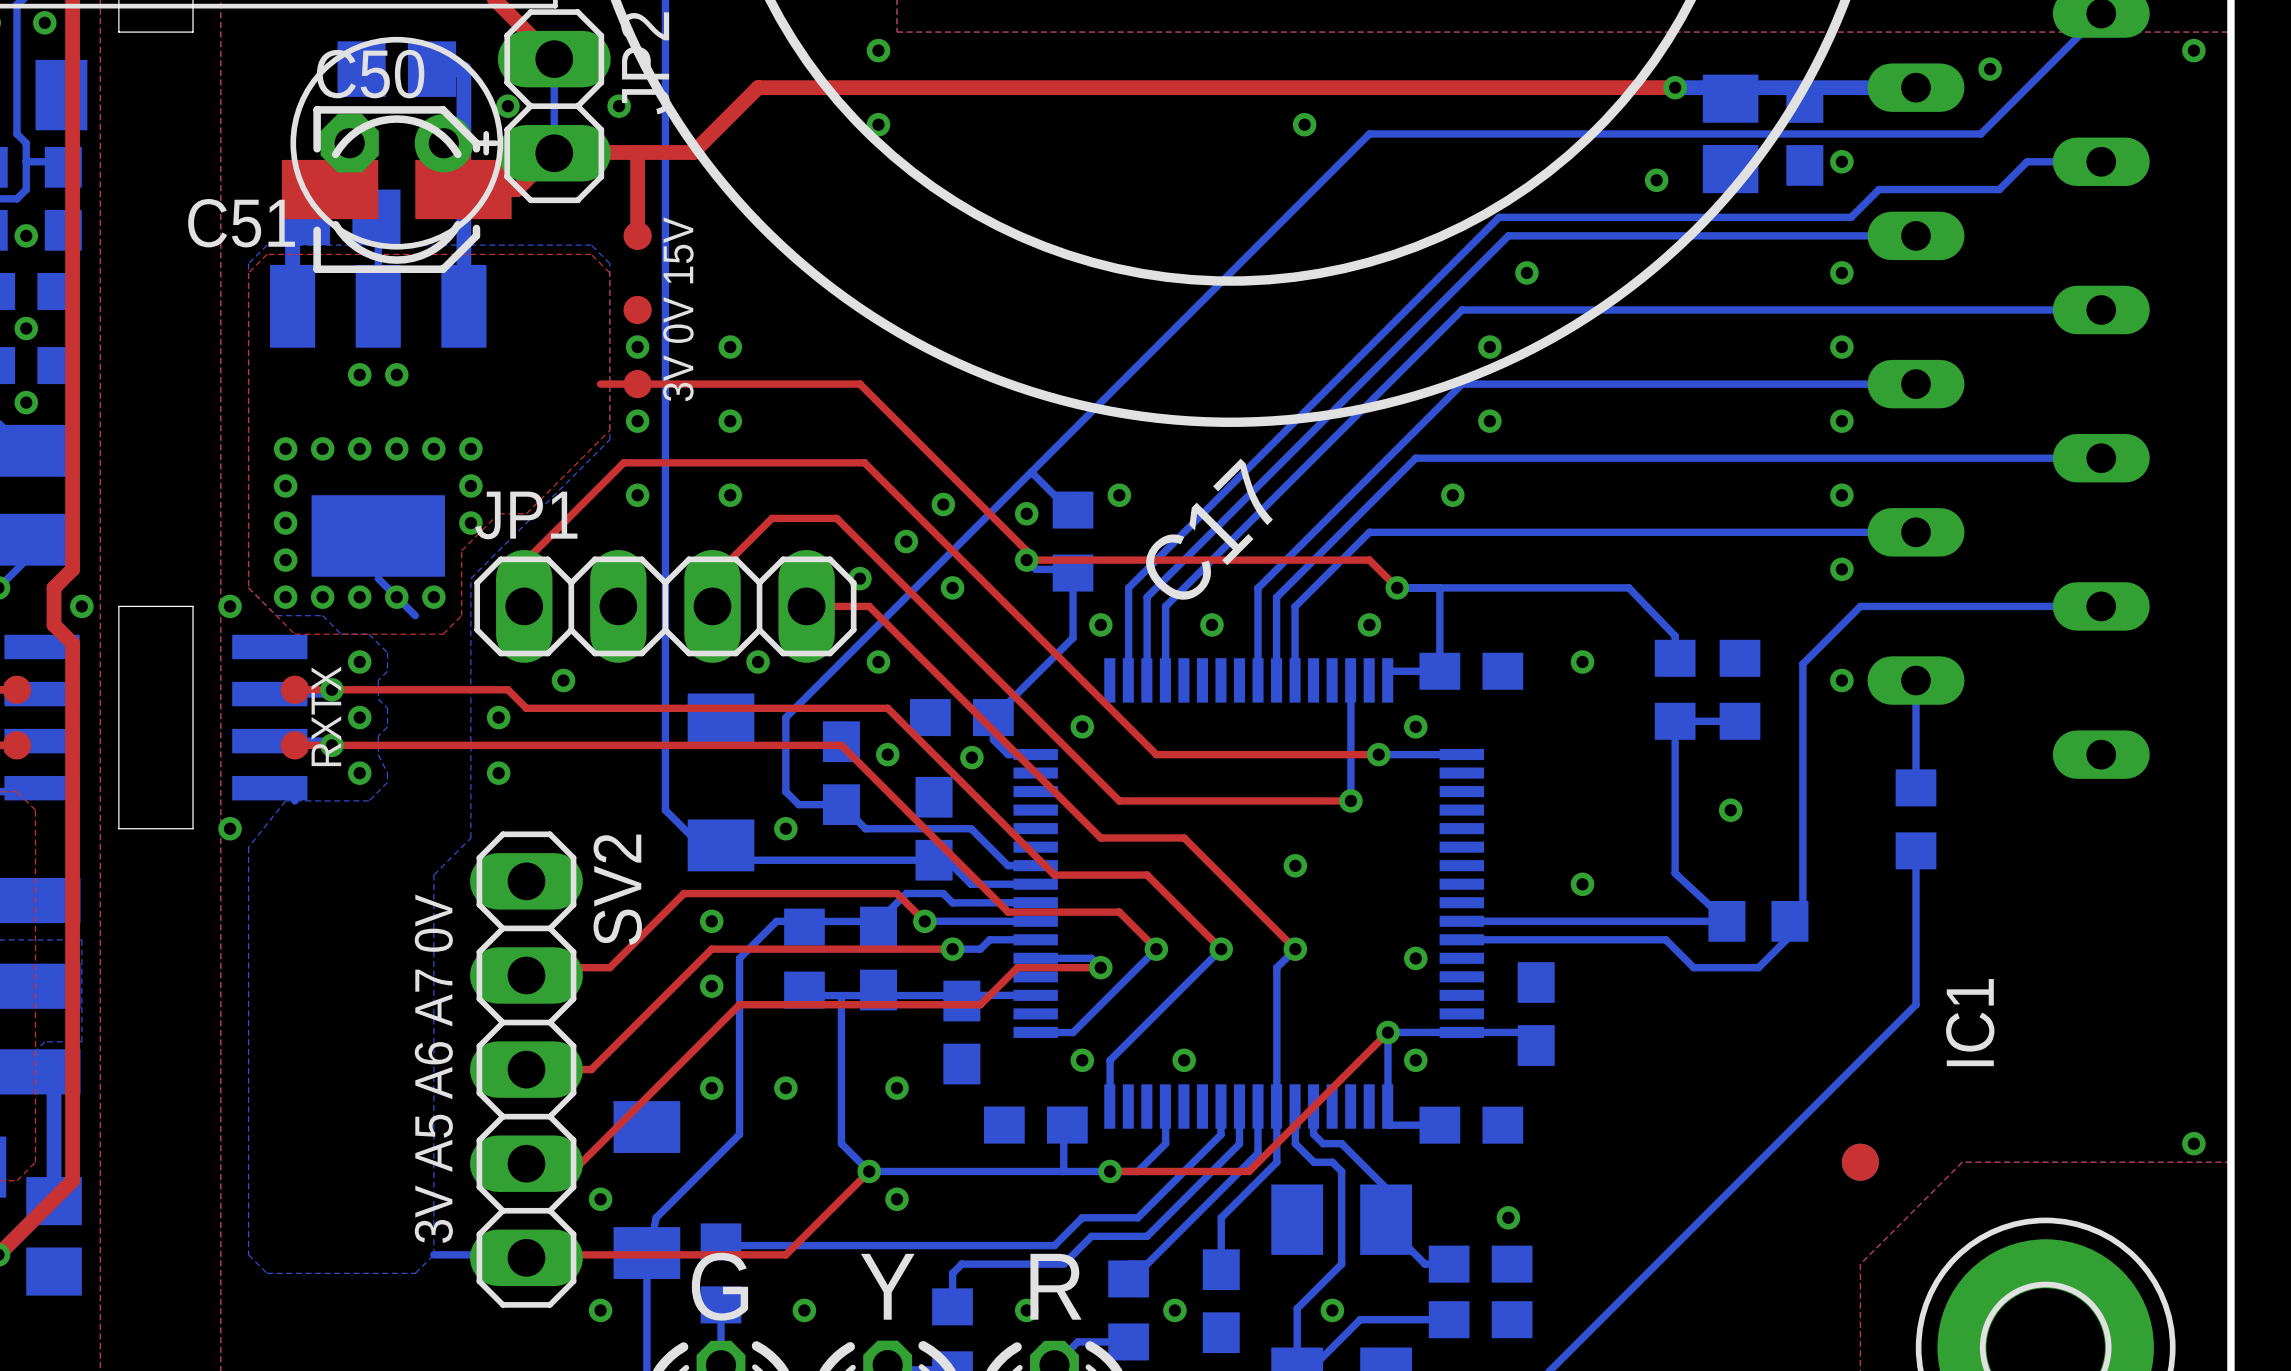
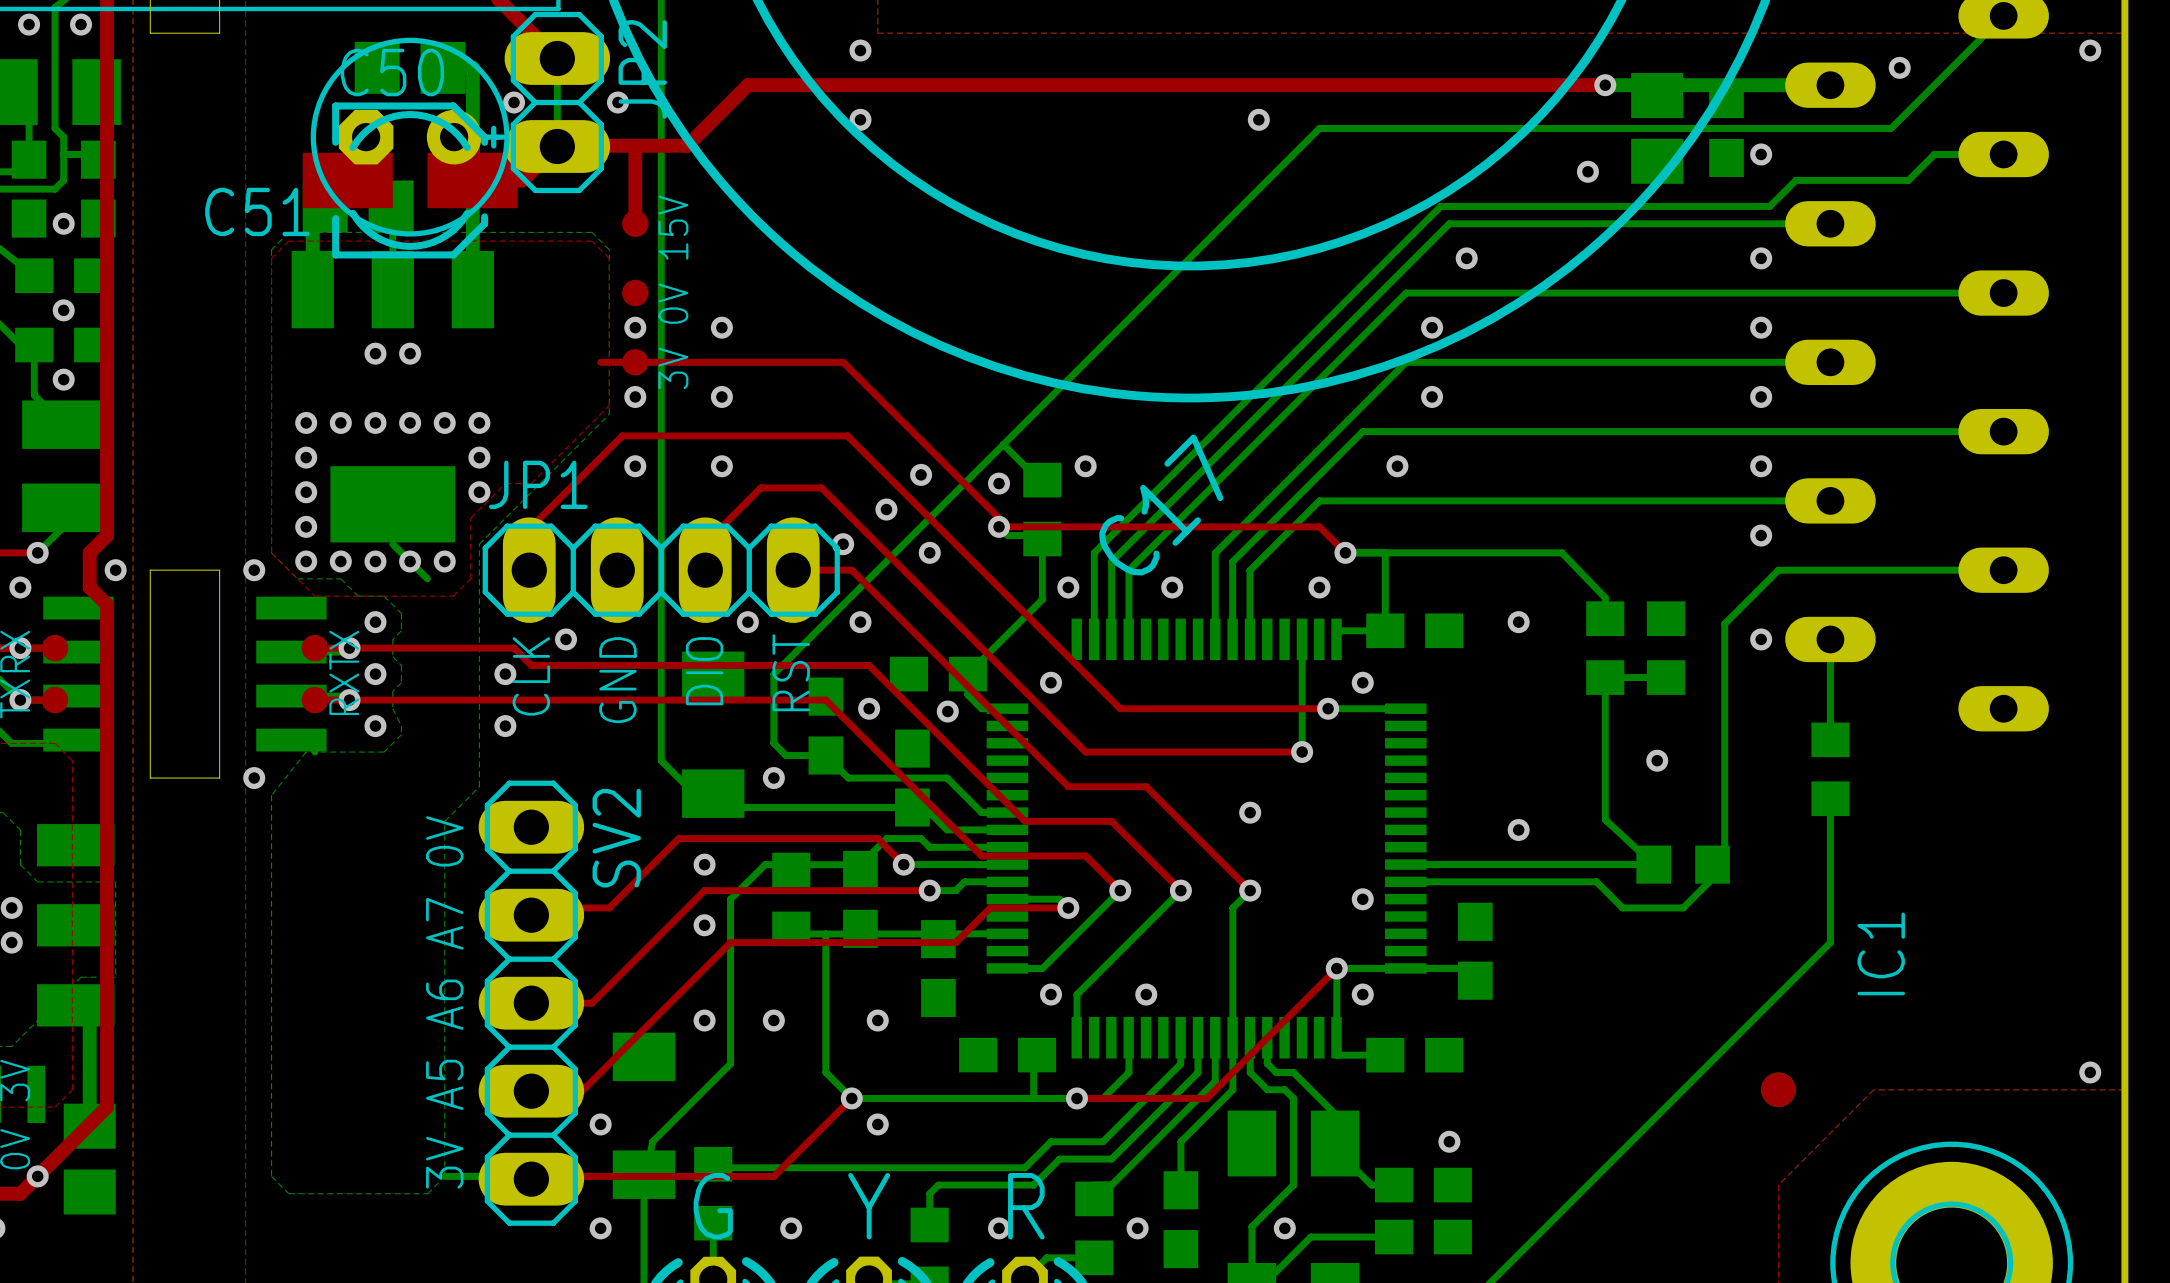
text: none -> DIO (704, 671)
text: none -> CLK (531, 676)
text: none -> RST (791, 672)
text: none -> GND (617, 680)

